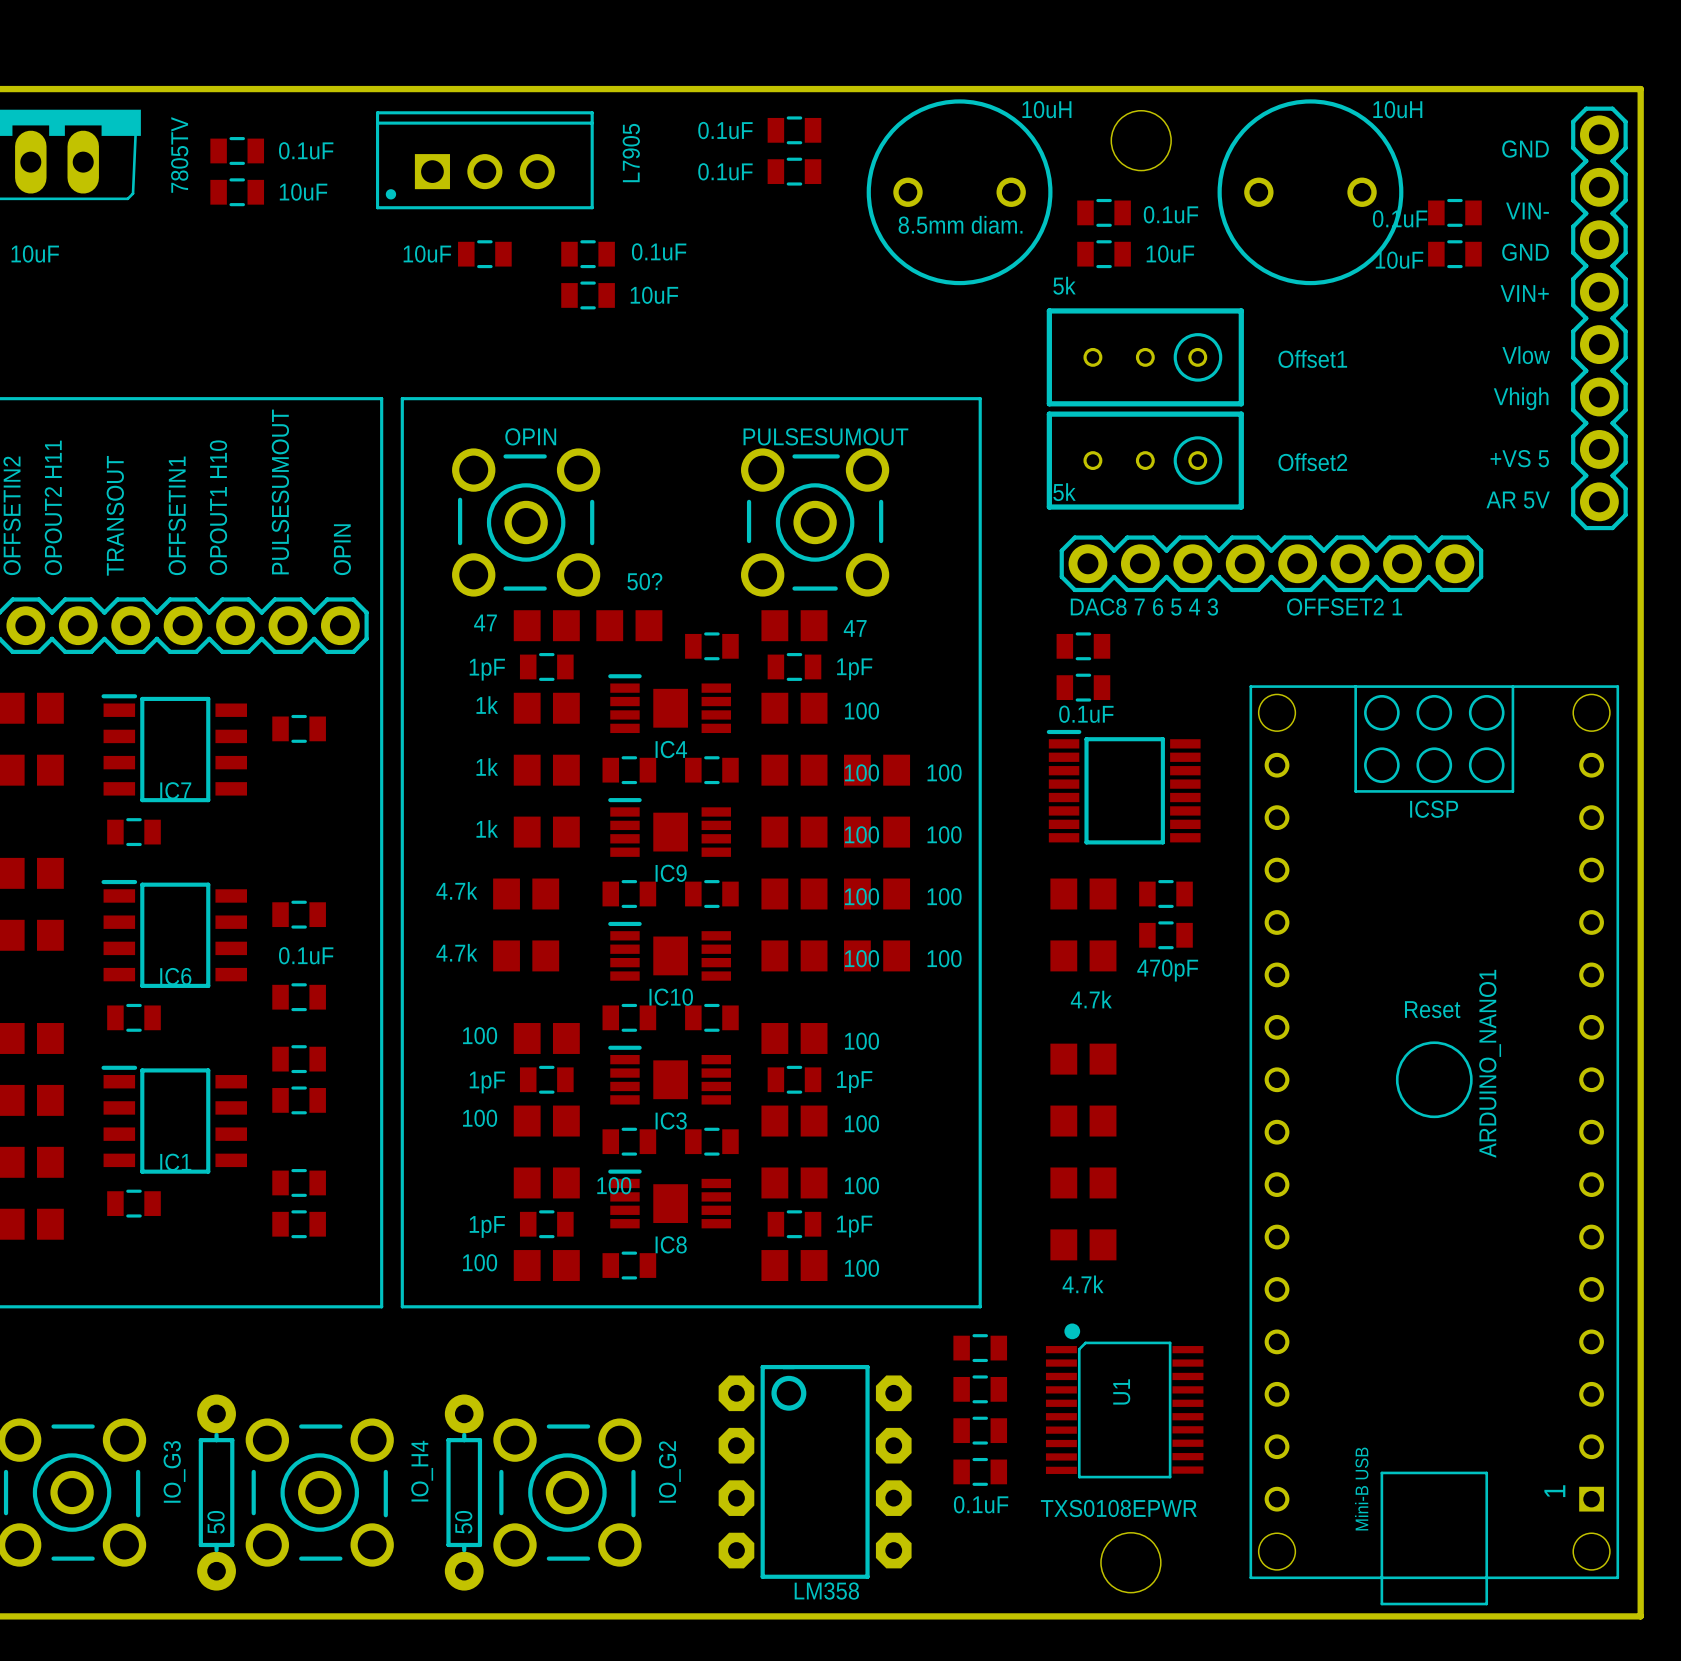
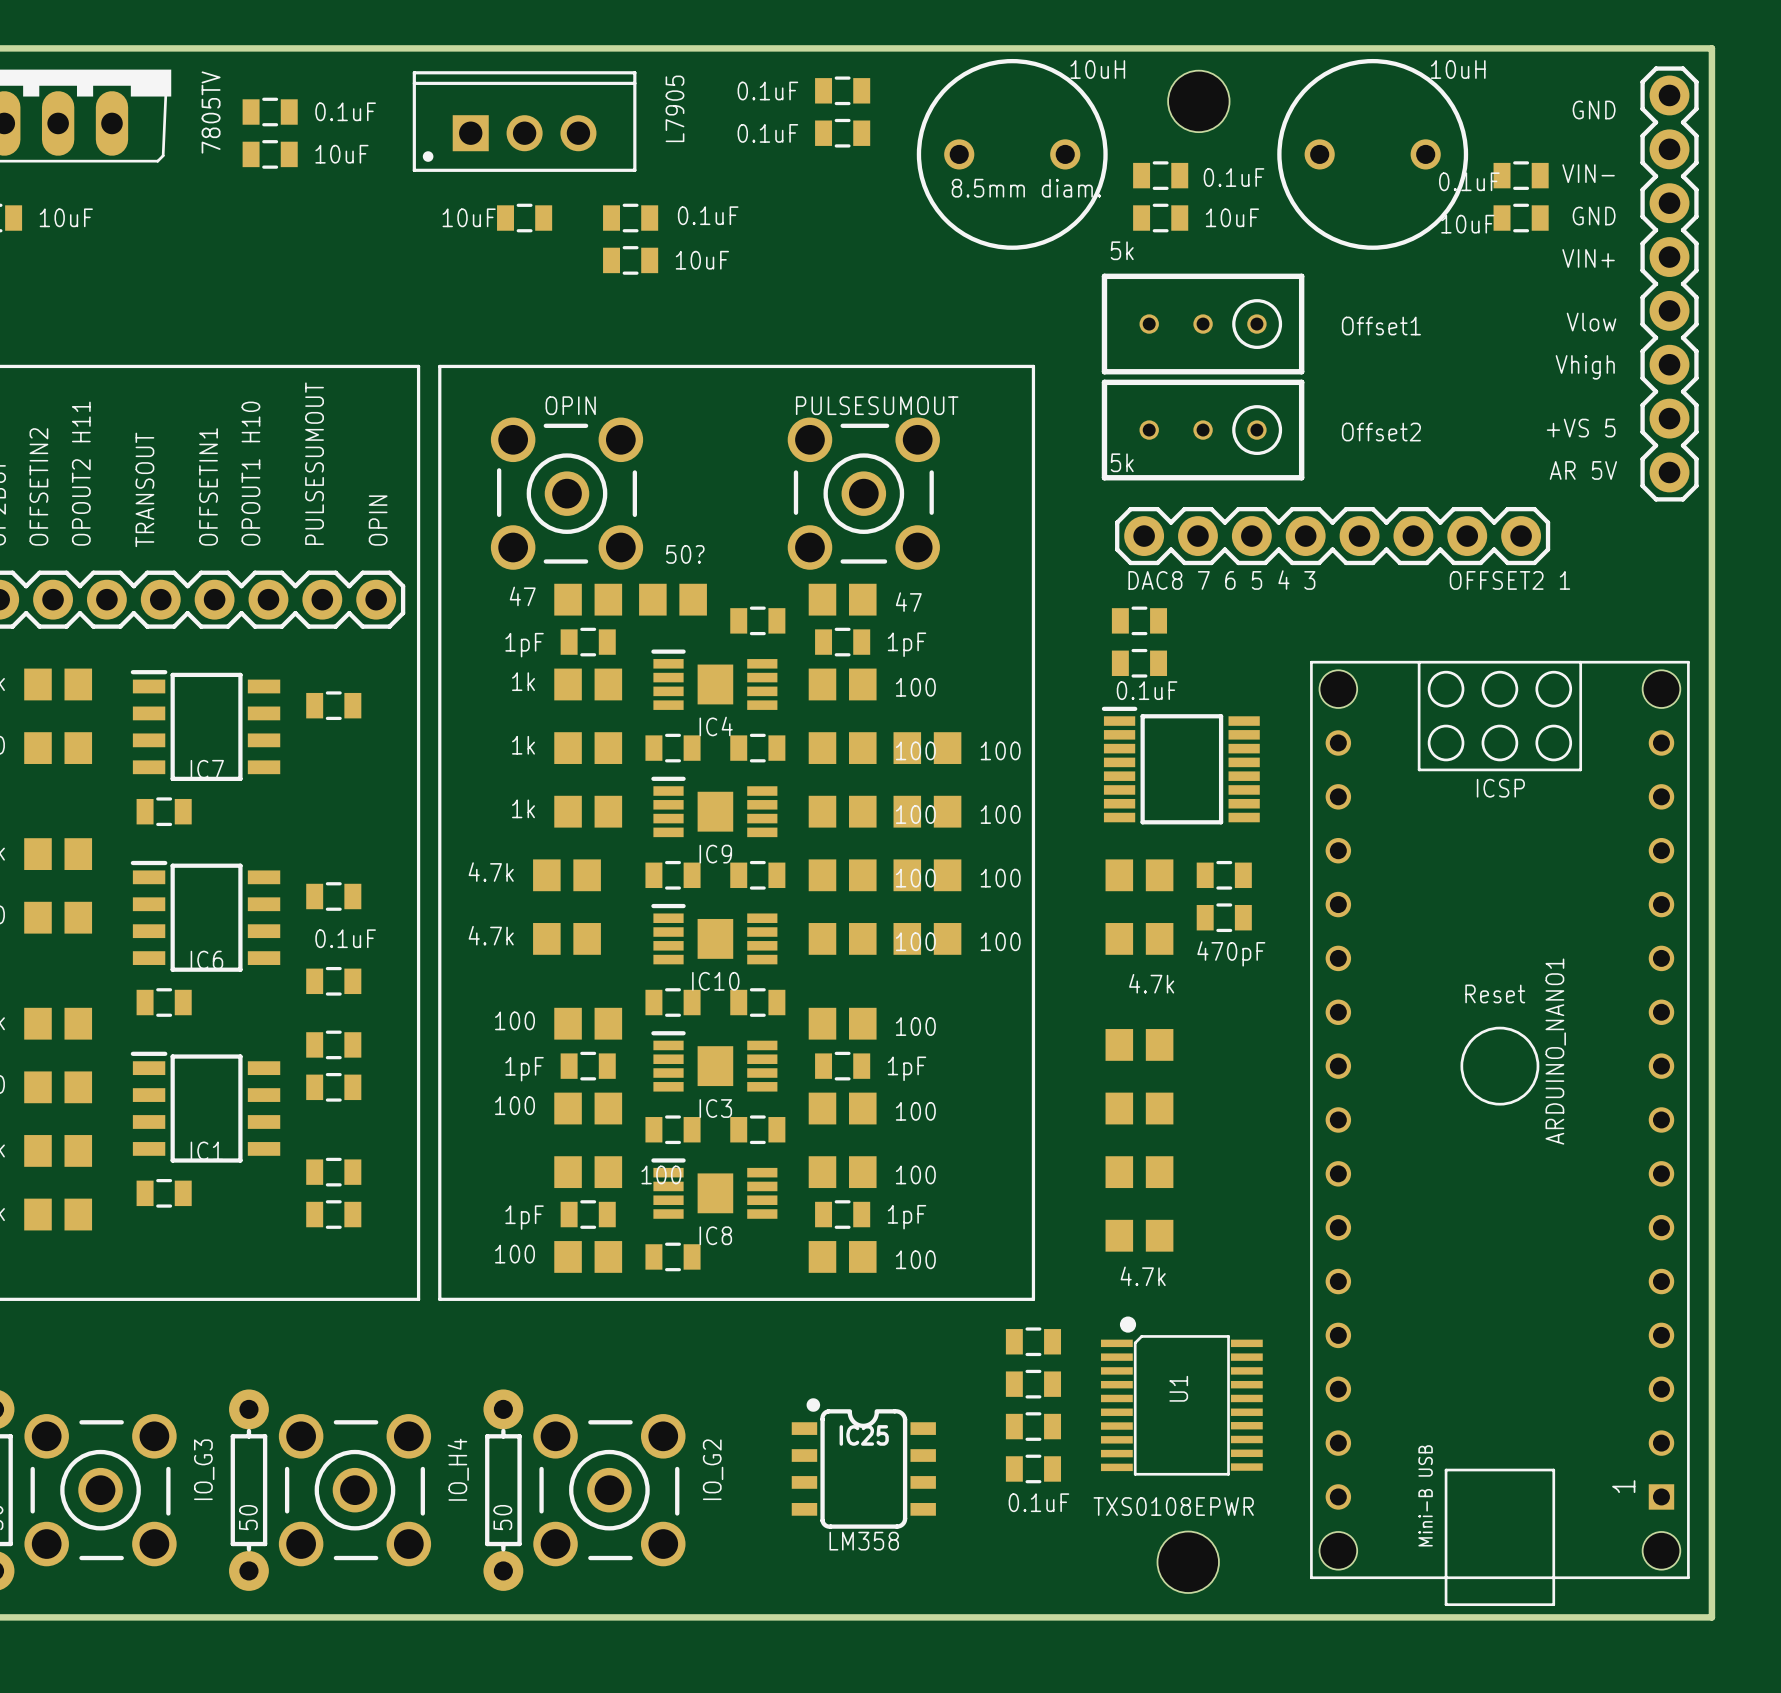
IC25: none -> LM358 (863, 1463)
part: LM358 (815, 1471) -> none

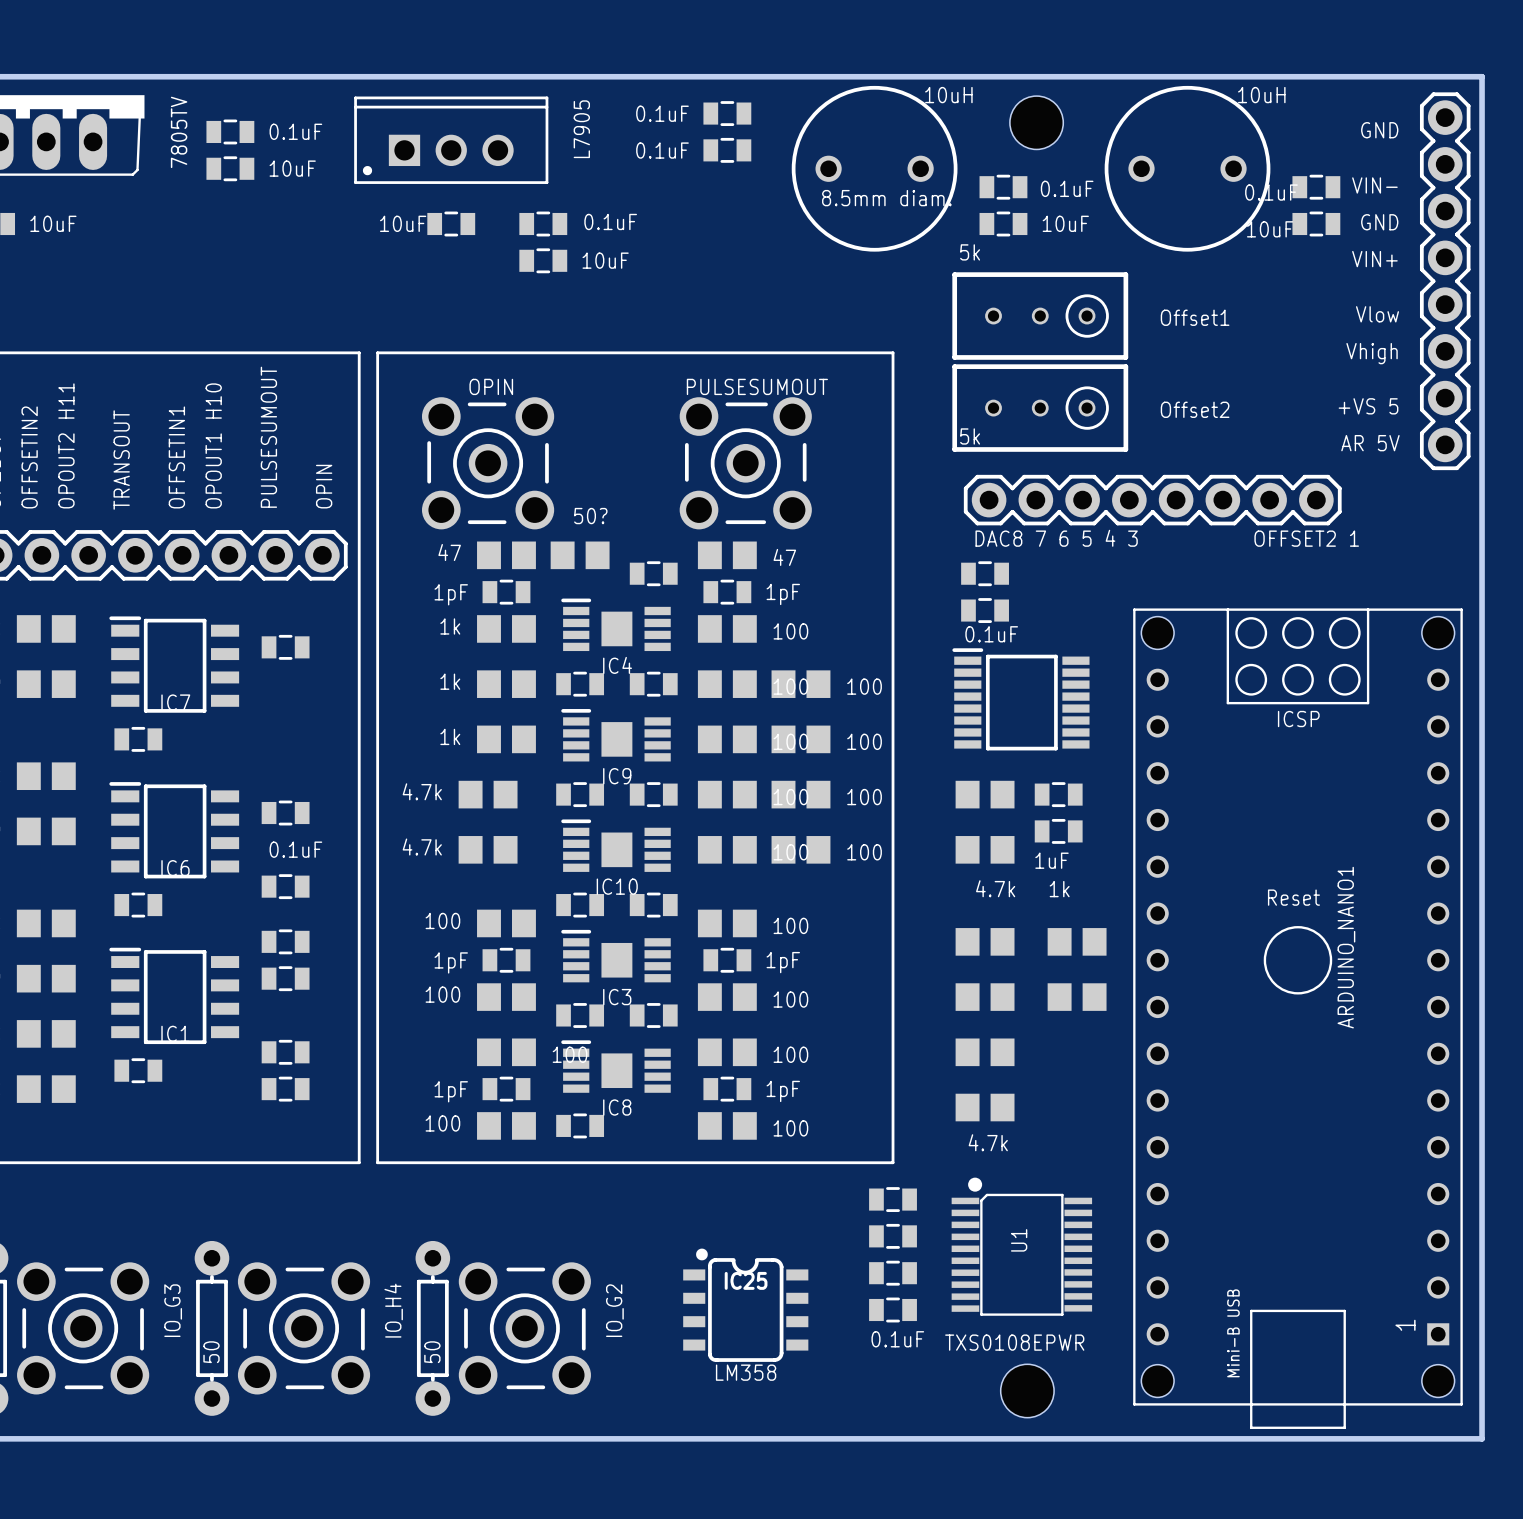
part value: 470pF (1231, 953) -> 1uF (1052, 860)
part: none -> (1077, 941)
part: none -> 1k (1077, 997)

